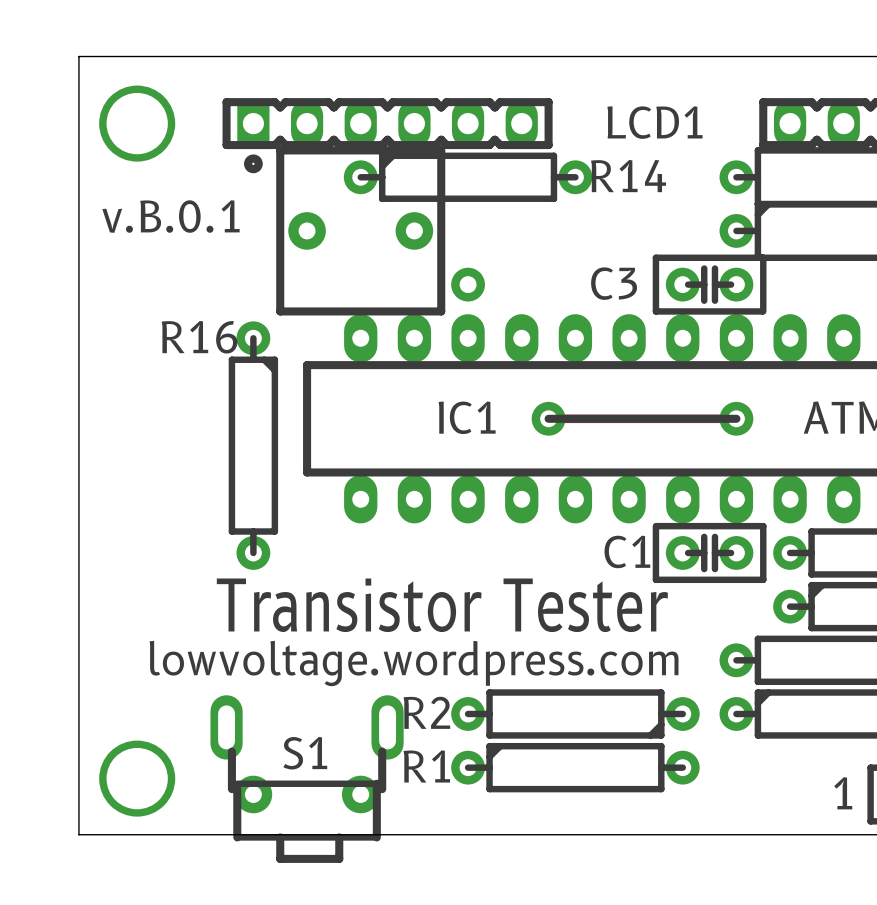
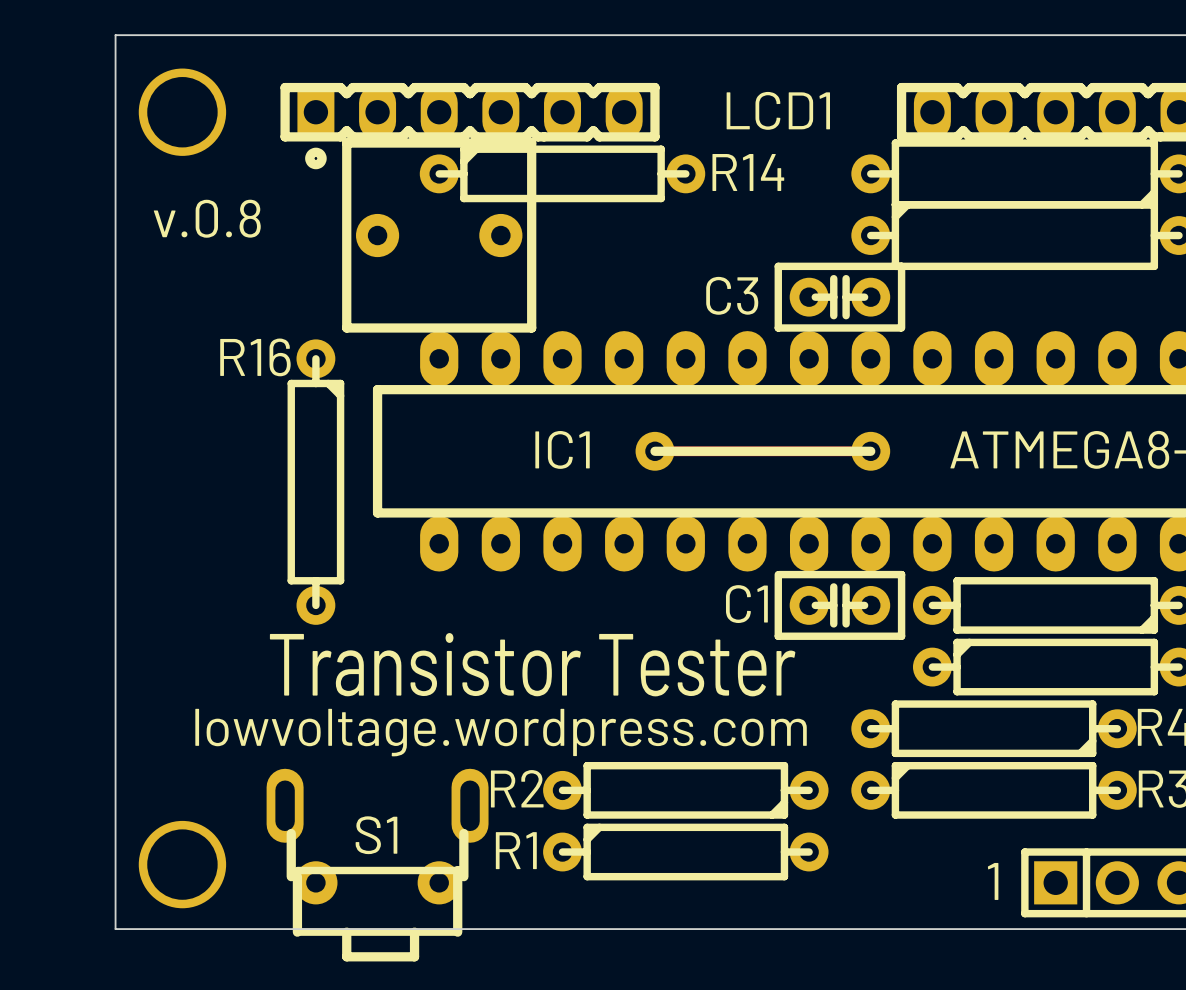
text: v.B.0.1 (170, 216) -> v.0.8 (207, 218)
part: (468, 284) -> none

